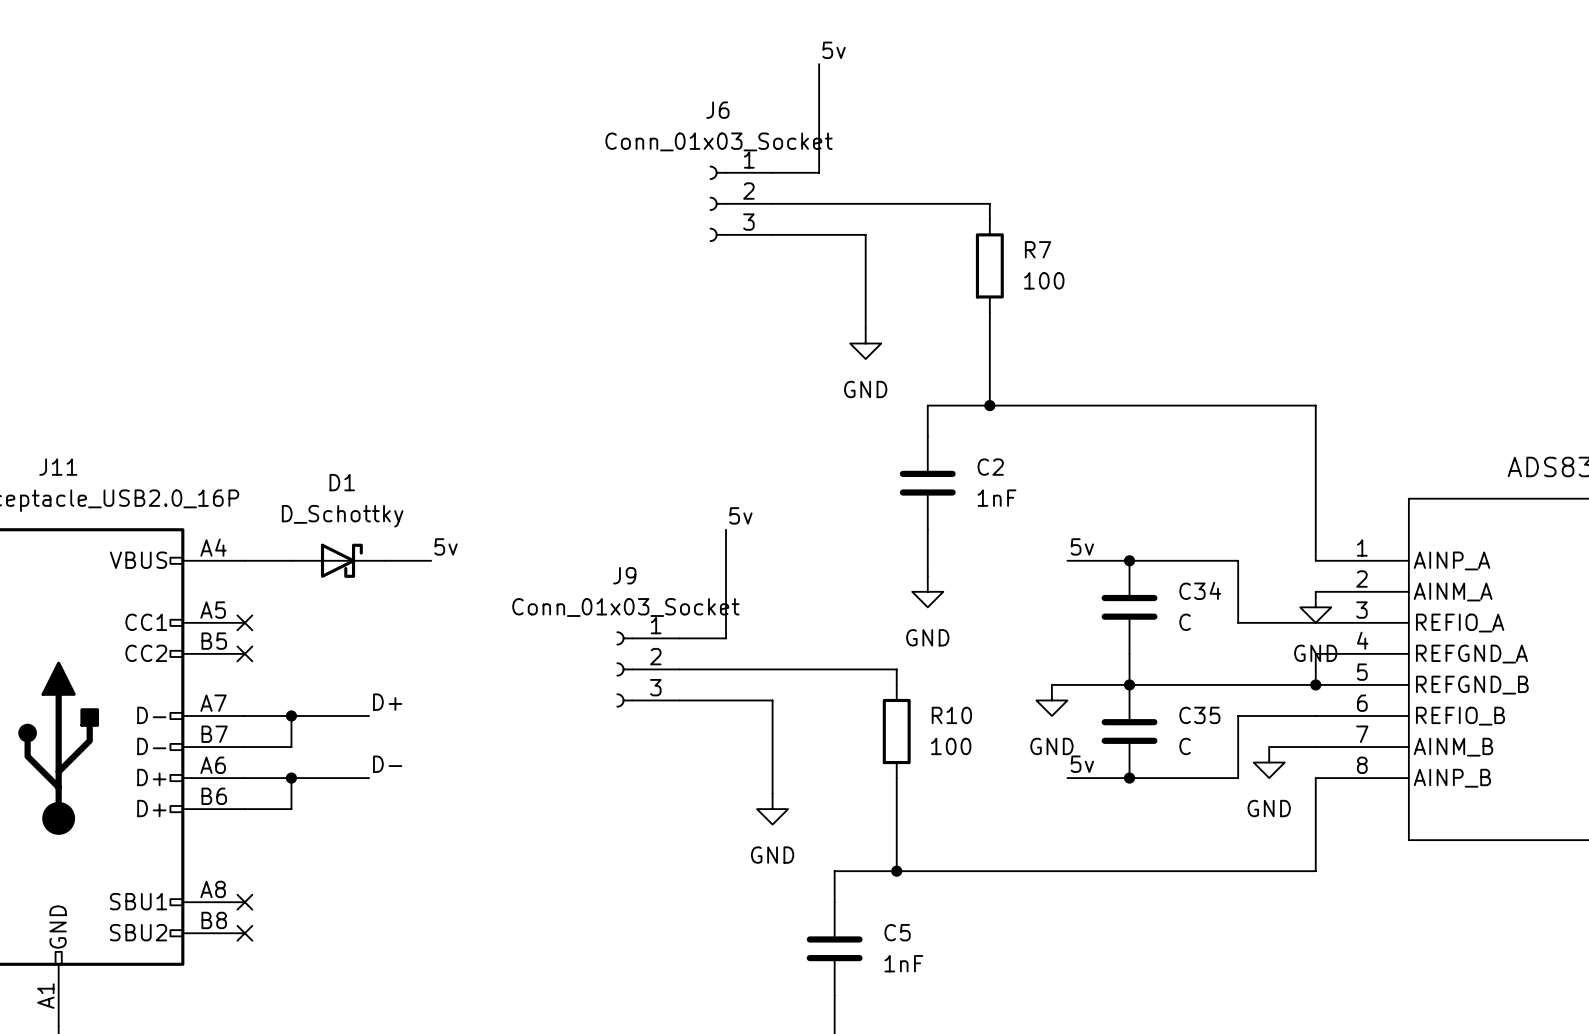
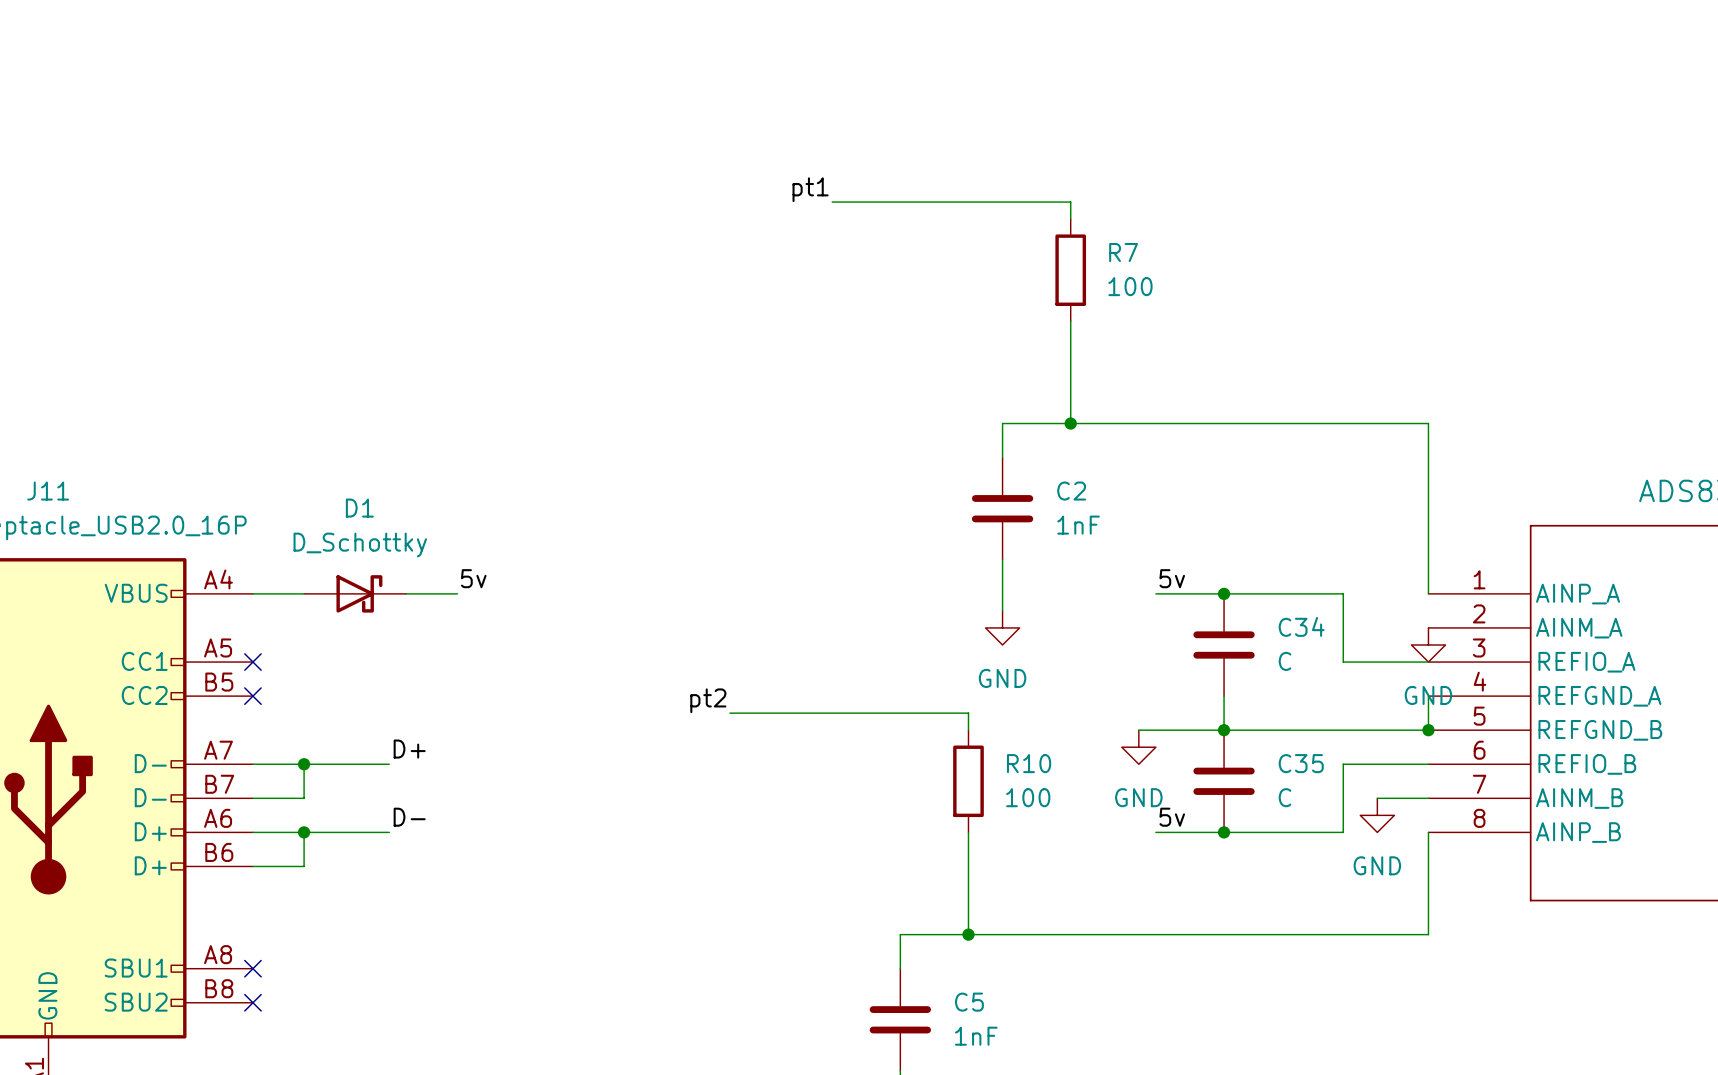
label: 5v (834, 50) -> none
wire: (819, 64) (819, 172) (772, 172) -> none
label: none -> pt1 (810, 189)
J6: Conn_01x03_Socket (741, 203) -> none
wire: (772, 234) (865, 234) (865, 327) -> none
power symbol: GND (865, 343) -> none
label: 5v (740, 515) -> none
wire: (726, 529) (726, 638) (679, 638) -> none
label: none -> pt2 (708, 700)
J9: Conn_01x03_Socket (647, 669) -> none
wire: (679, 700) (772, 700) (772, 793) -> none
power symbol: GND (772, 809) -> none

